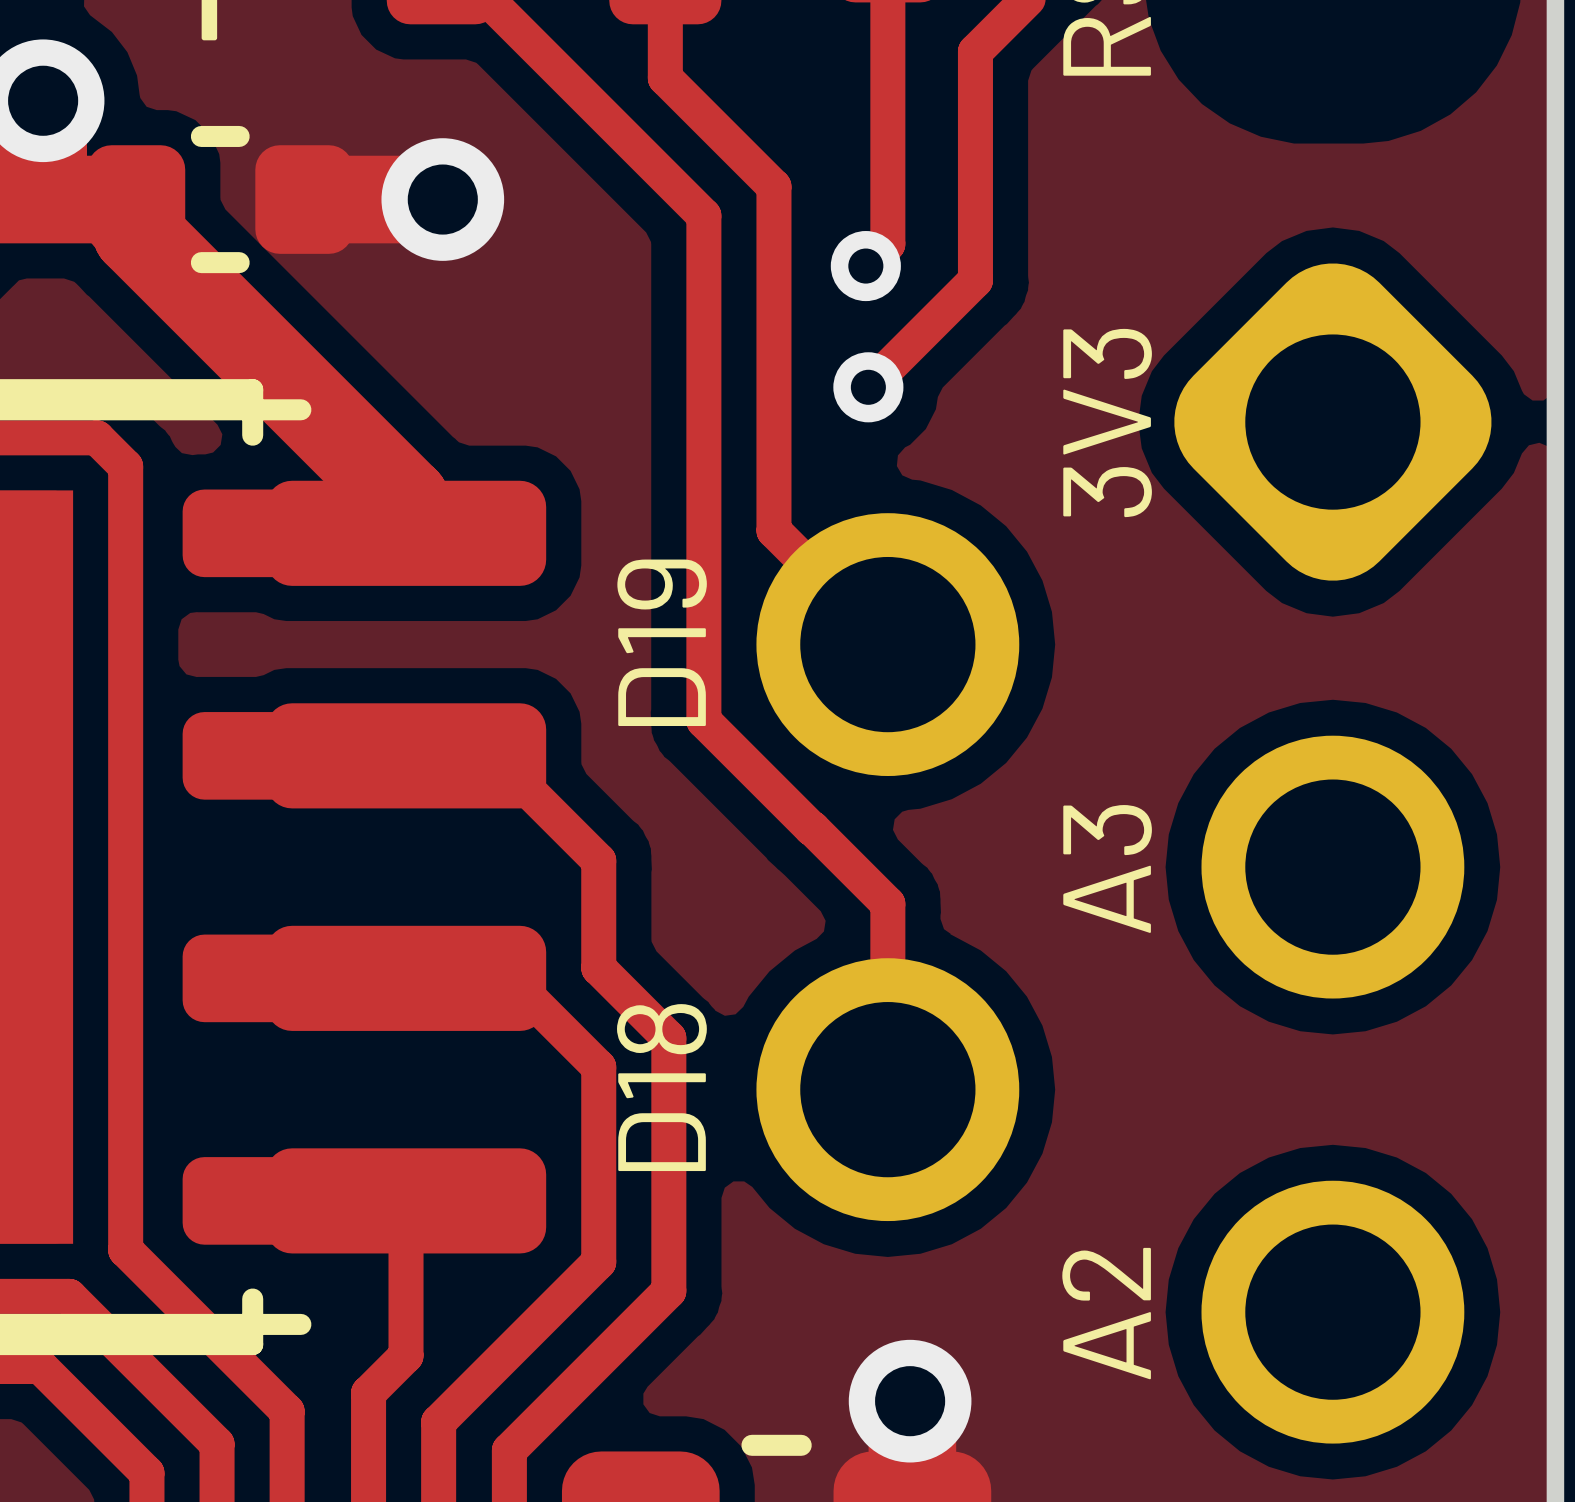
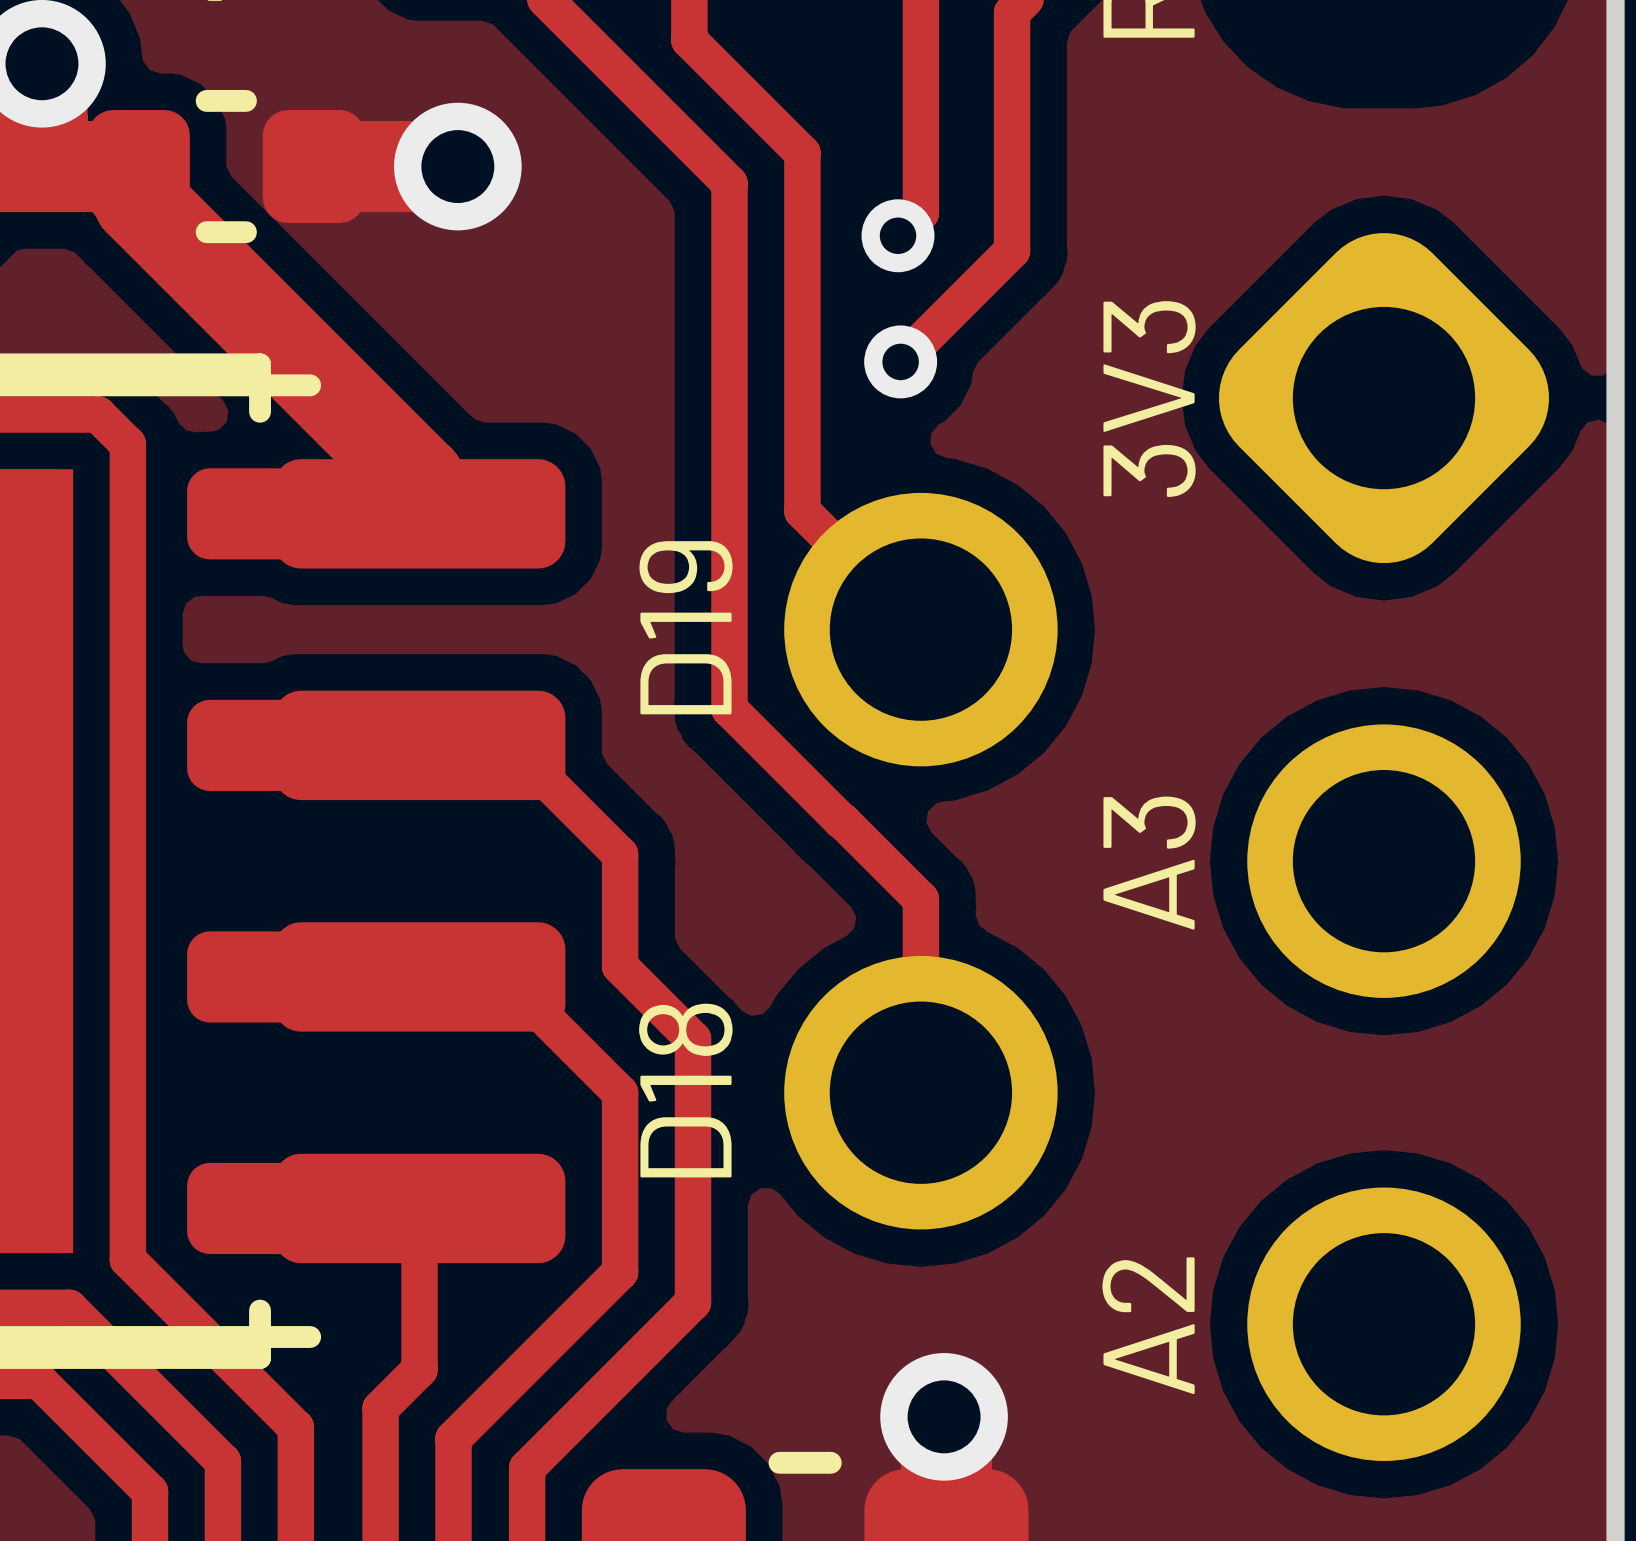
track: (487, 978) (509, 978) (598, 1067) (598, 1089) -> (504, 976) (620, 1092)

